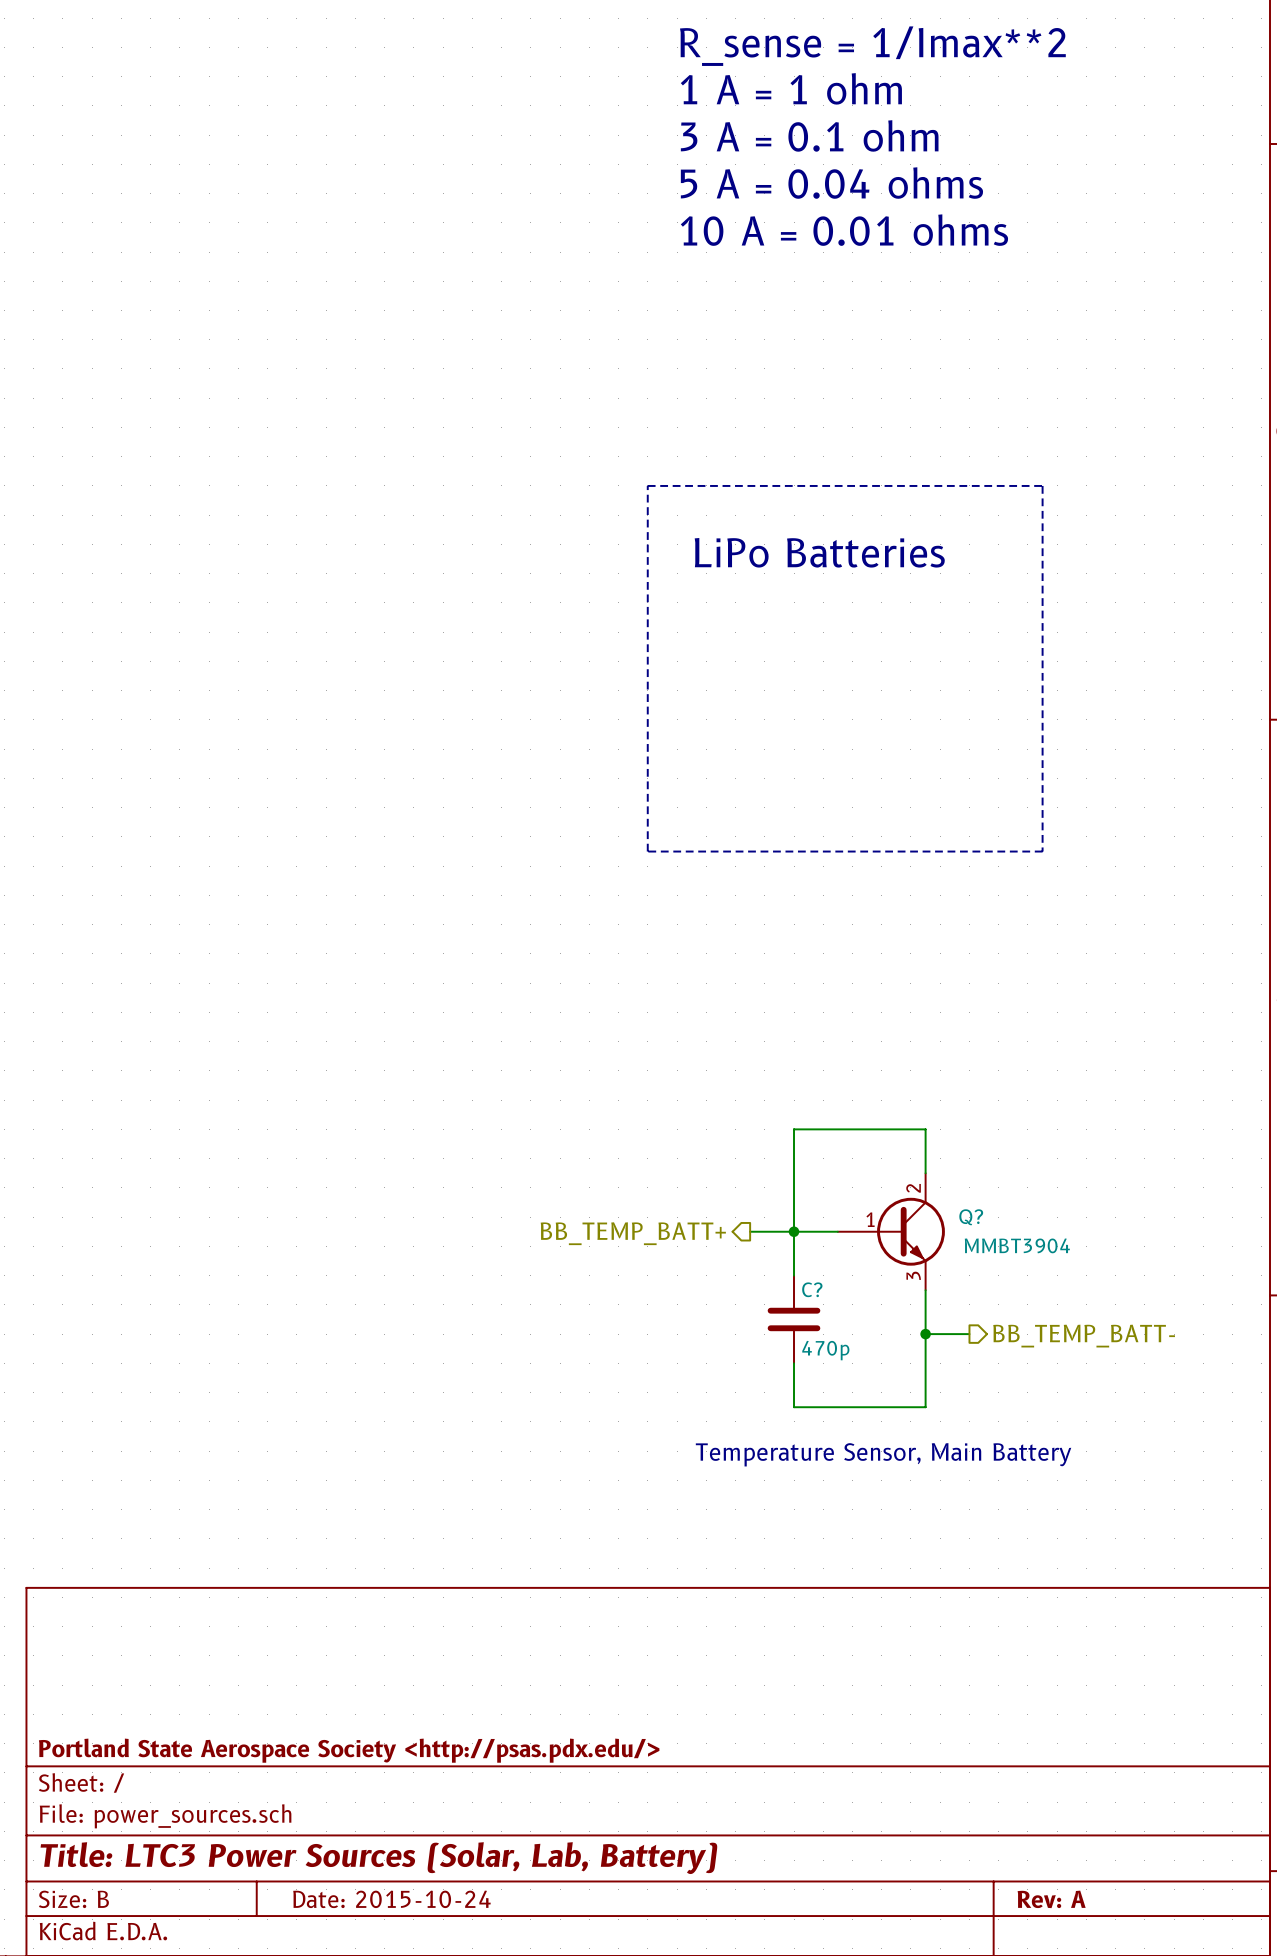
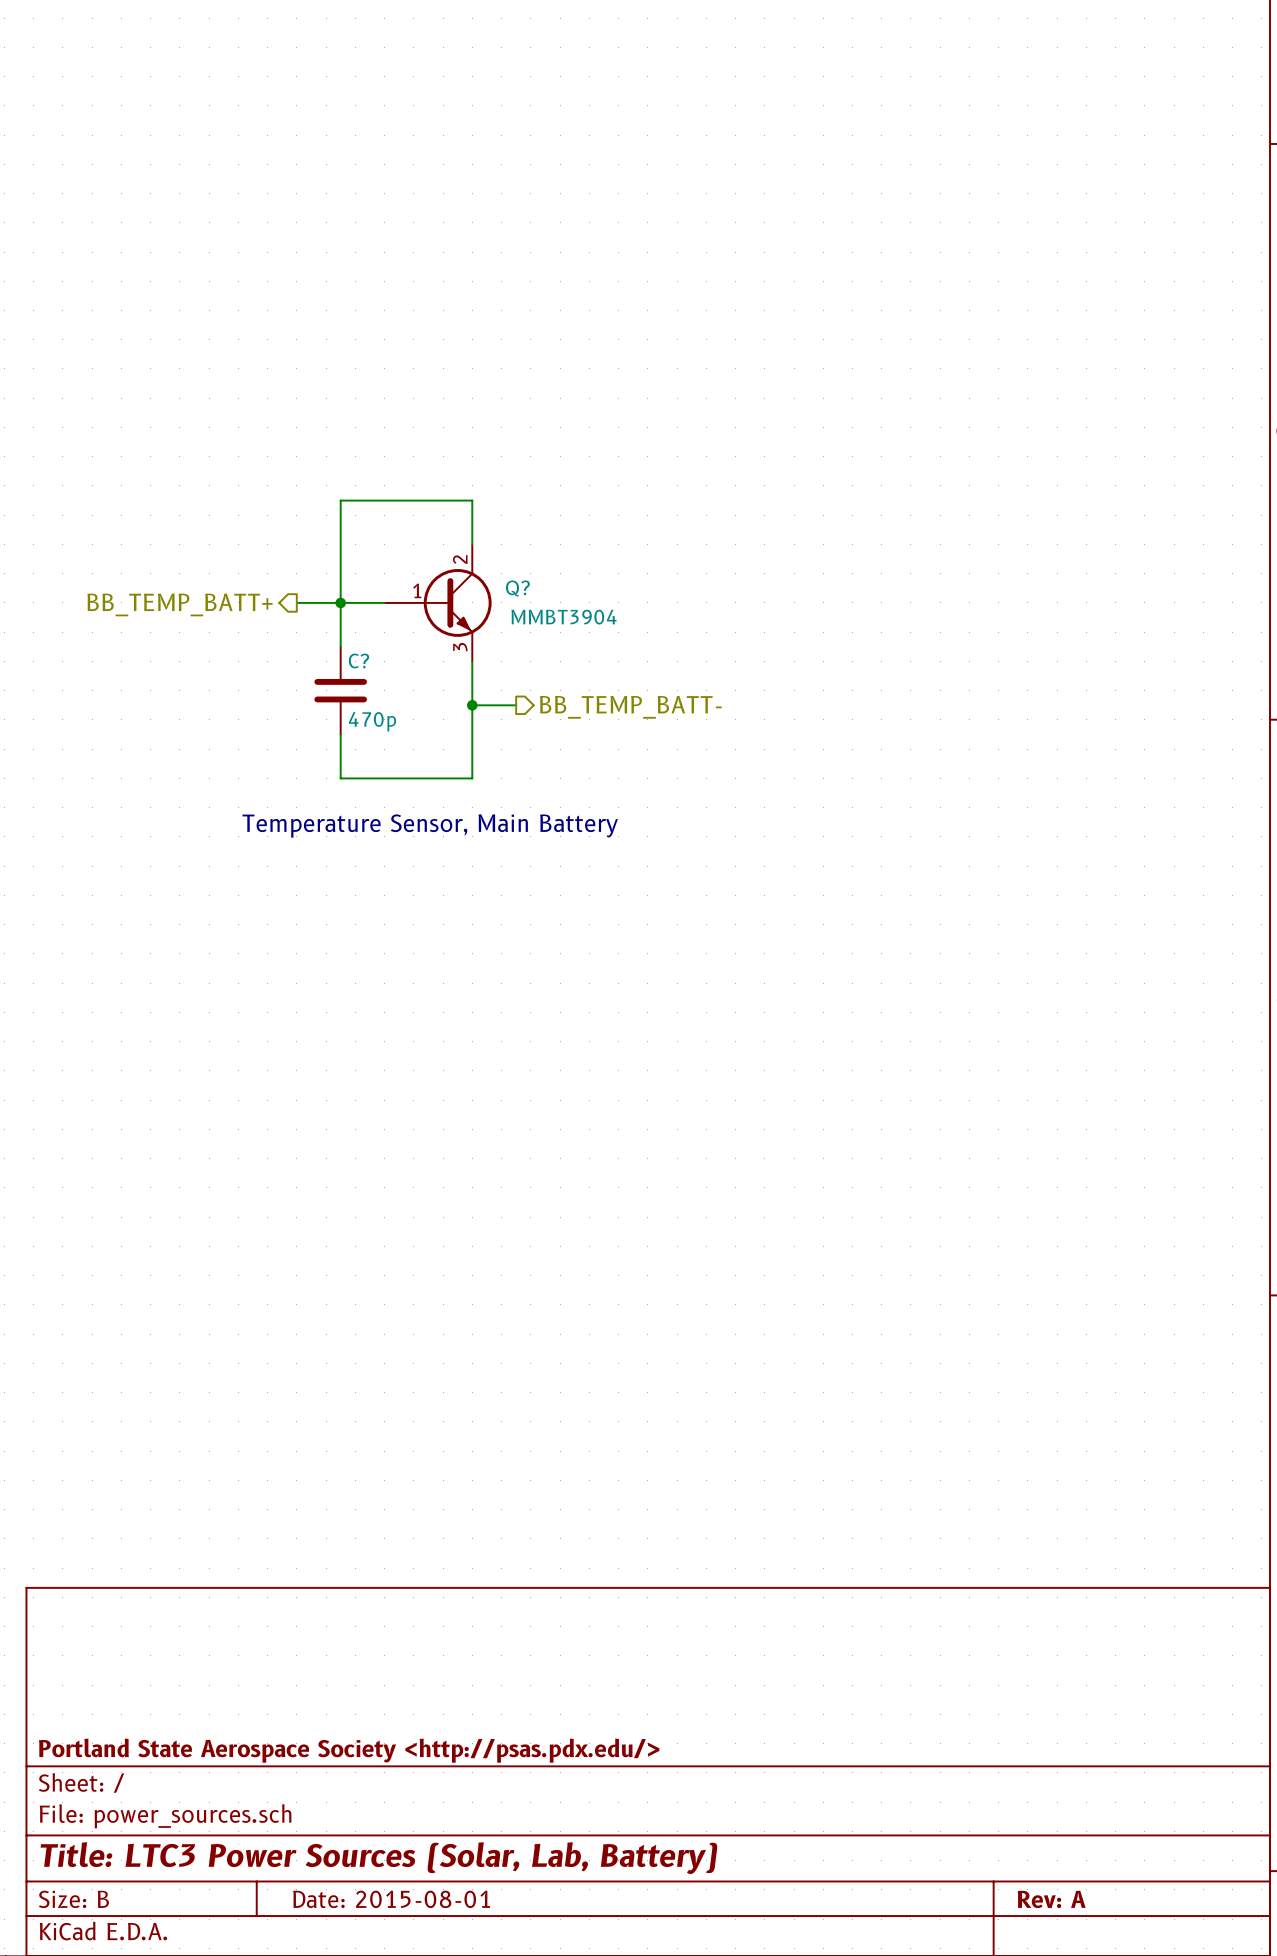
text: R_sense = 1/Imax**2 (872, 46) -> none
text: 1 A = 1 ohm (791, 88) -> none
text: 3 A = 0.1 ohm (809, 135) -> none
text: 5 A = 0.04 ohms (831, 183) -> none
text: 10 A = 0.01 ohms (844, 230) -> none
line: (647, 485) (1042, 485) (1042, 851) (647, 851) (647, 485) -> none
wire: none -> (472, 544) (472, 500) (340, 500) (340, 646)
text: LiPo Batteries (819, 552) -> none
wire: none -> (296, 602) (384, 602)
junction: none -> (340, 602)
Q?: none -> MMBT3904 (438, 602)
hierarchical label: none -> BB_TEMP_BATT+ (179, 604)
wire: none -> (472, 661) (472, 778) (340, 778) (340, 734)
C?: none -> 470p (340, 690)
wire: none -> (472, 705) (516, 705)
junction: none -> (472, 705)
hierarchical label: none -> BB_TEMP_BATT- (630, 707)
text: none -> Temperature Sensor, Main Battery (430, 826)
wire: (925, 1173) (925, 1129) (794, 1129) (794, 1275) -> none
wire: (750, 1231) (837, 1231) -> none
junction: (794, 1231) -> none
Q?: MMBT3904 (891, 1231) -> none
hierarchical label: BB_TEMP_BATT+ (633, 1233) -> none
wire: (925, 1290) (925, 1407) (794, 1407) (794, 1363) -> none
C?: 470p (794, 1319) -> none
wire: (925, 1334) (969, 1334) -> none
junction: (925, 1334) -> none
hierarchical label: BB_TEMP_BATT- (1084, 1336) -> none
text: Temperature Sensor, Main Battery (883, 1454) -> none
title block: Date: 2015-10-24 (391, 1899) -> Date: 2015-08-01 (391, 1899)

